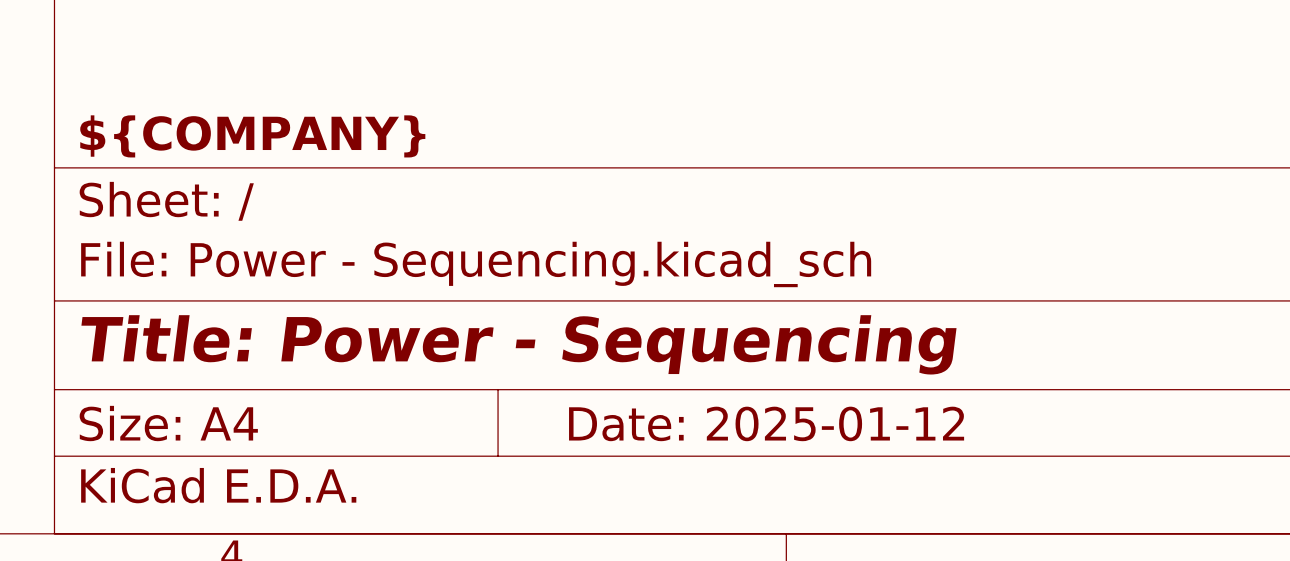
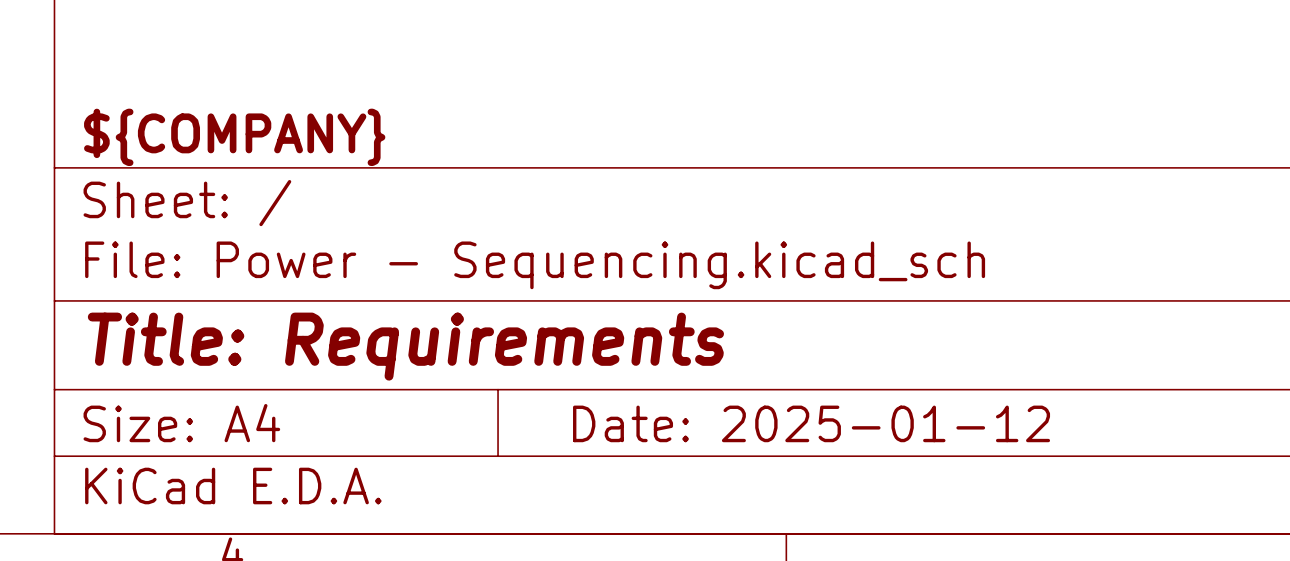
title block: Title: Power - Sequencing (518, 344) -> Title: Requirements (405, 346)

